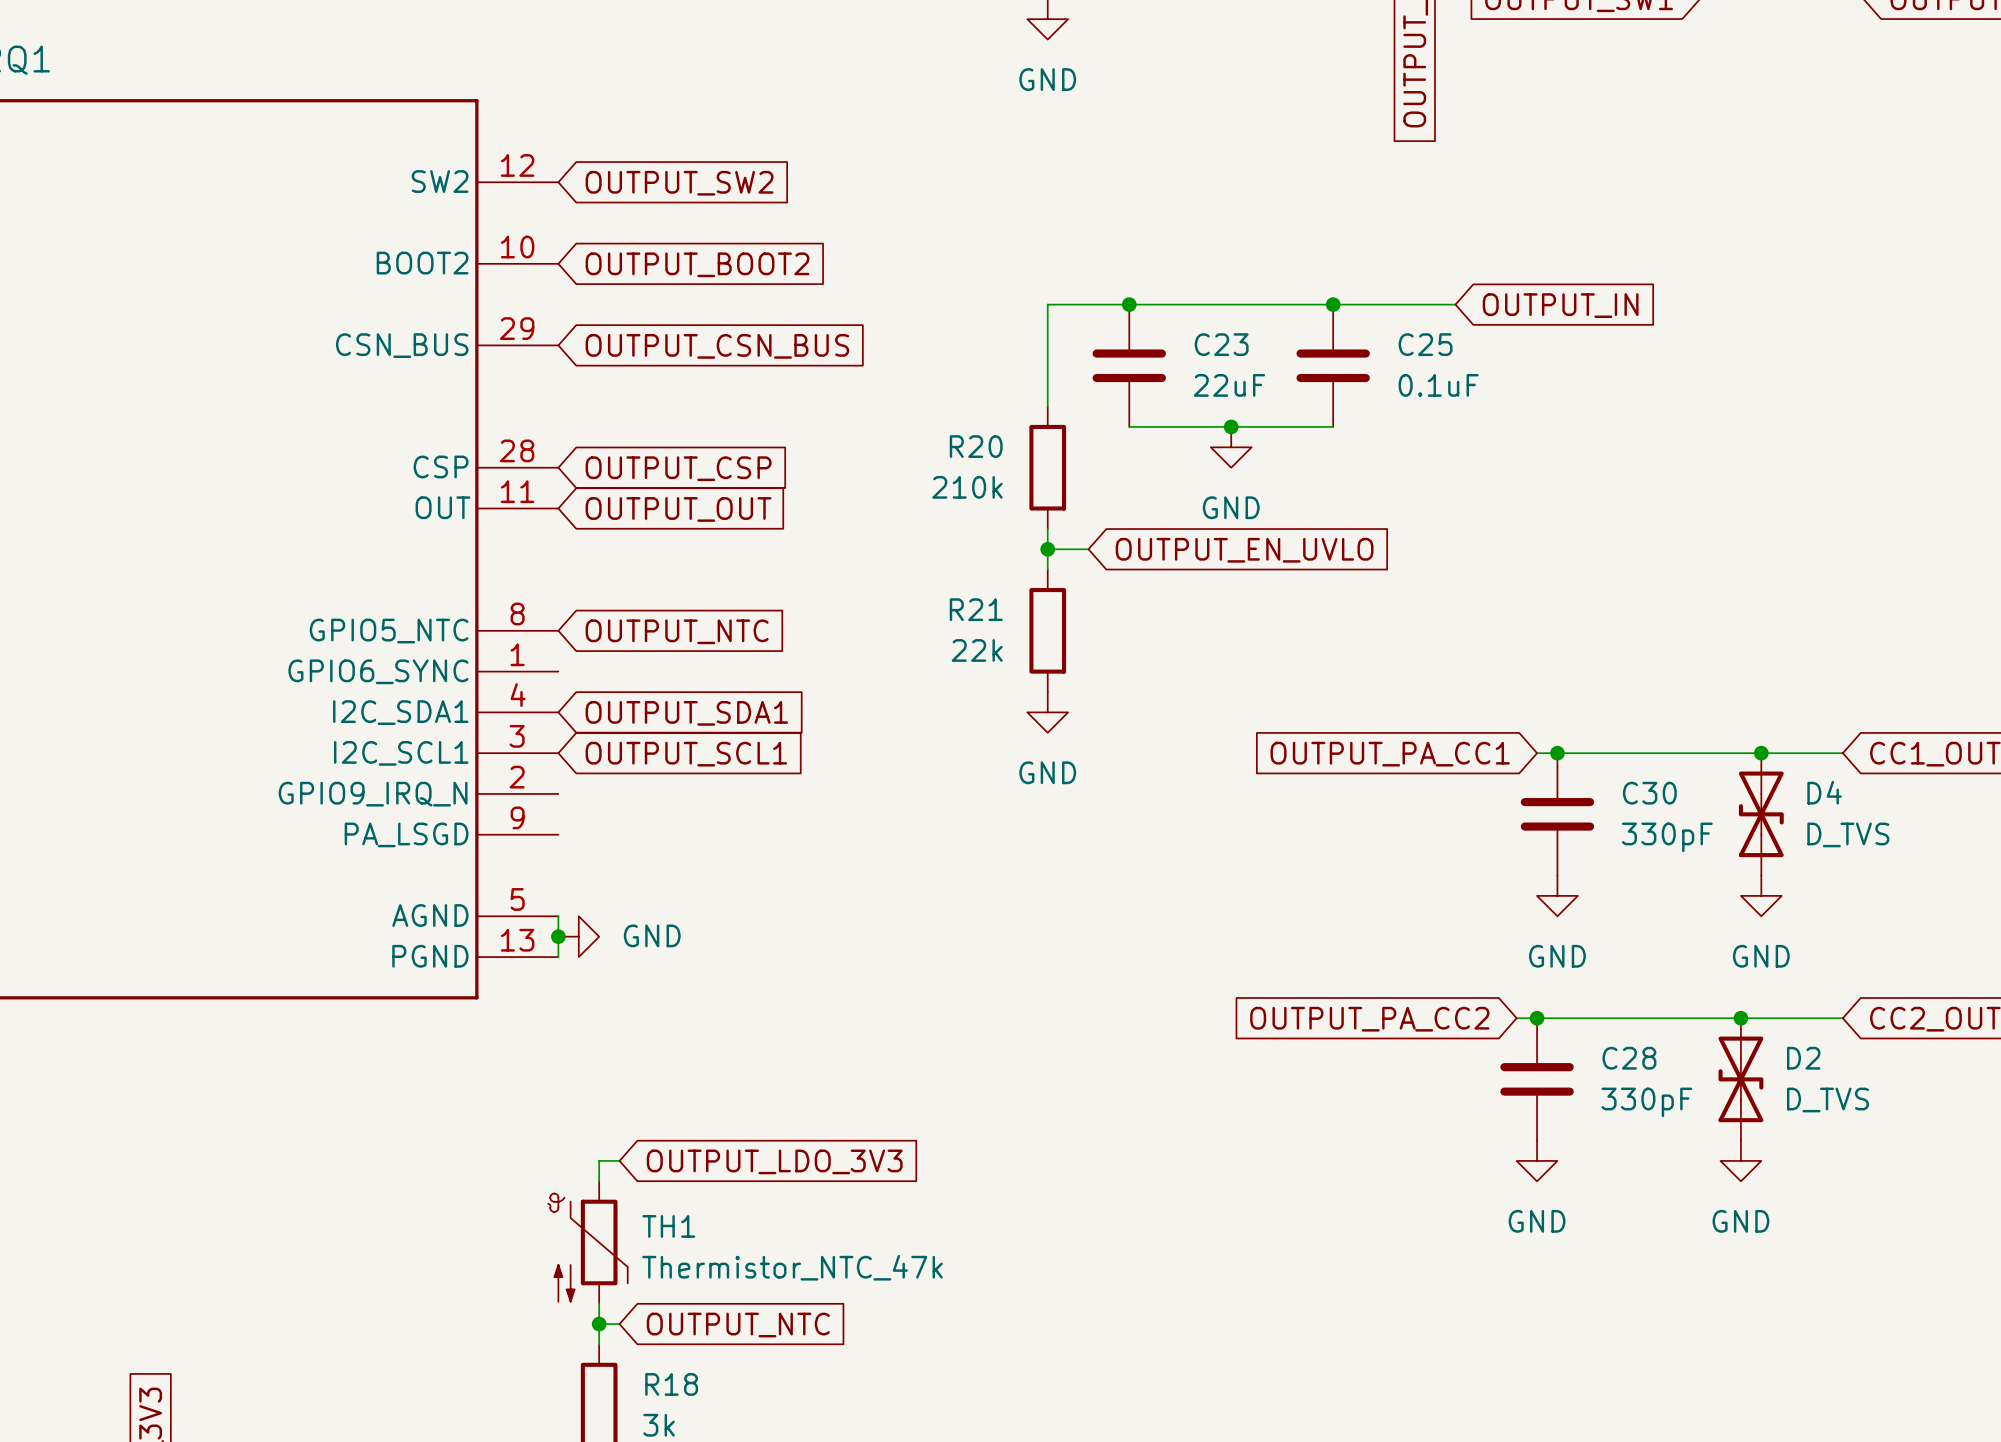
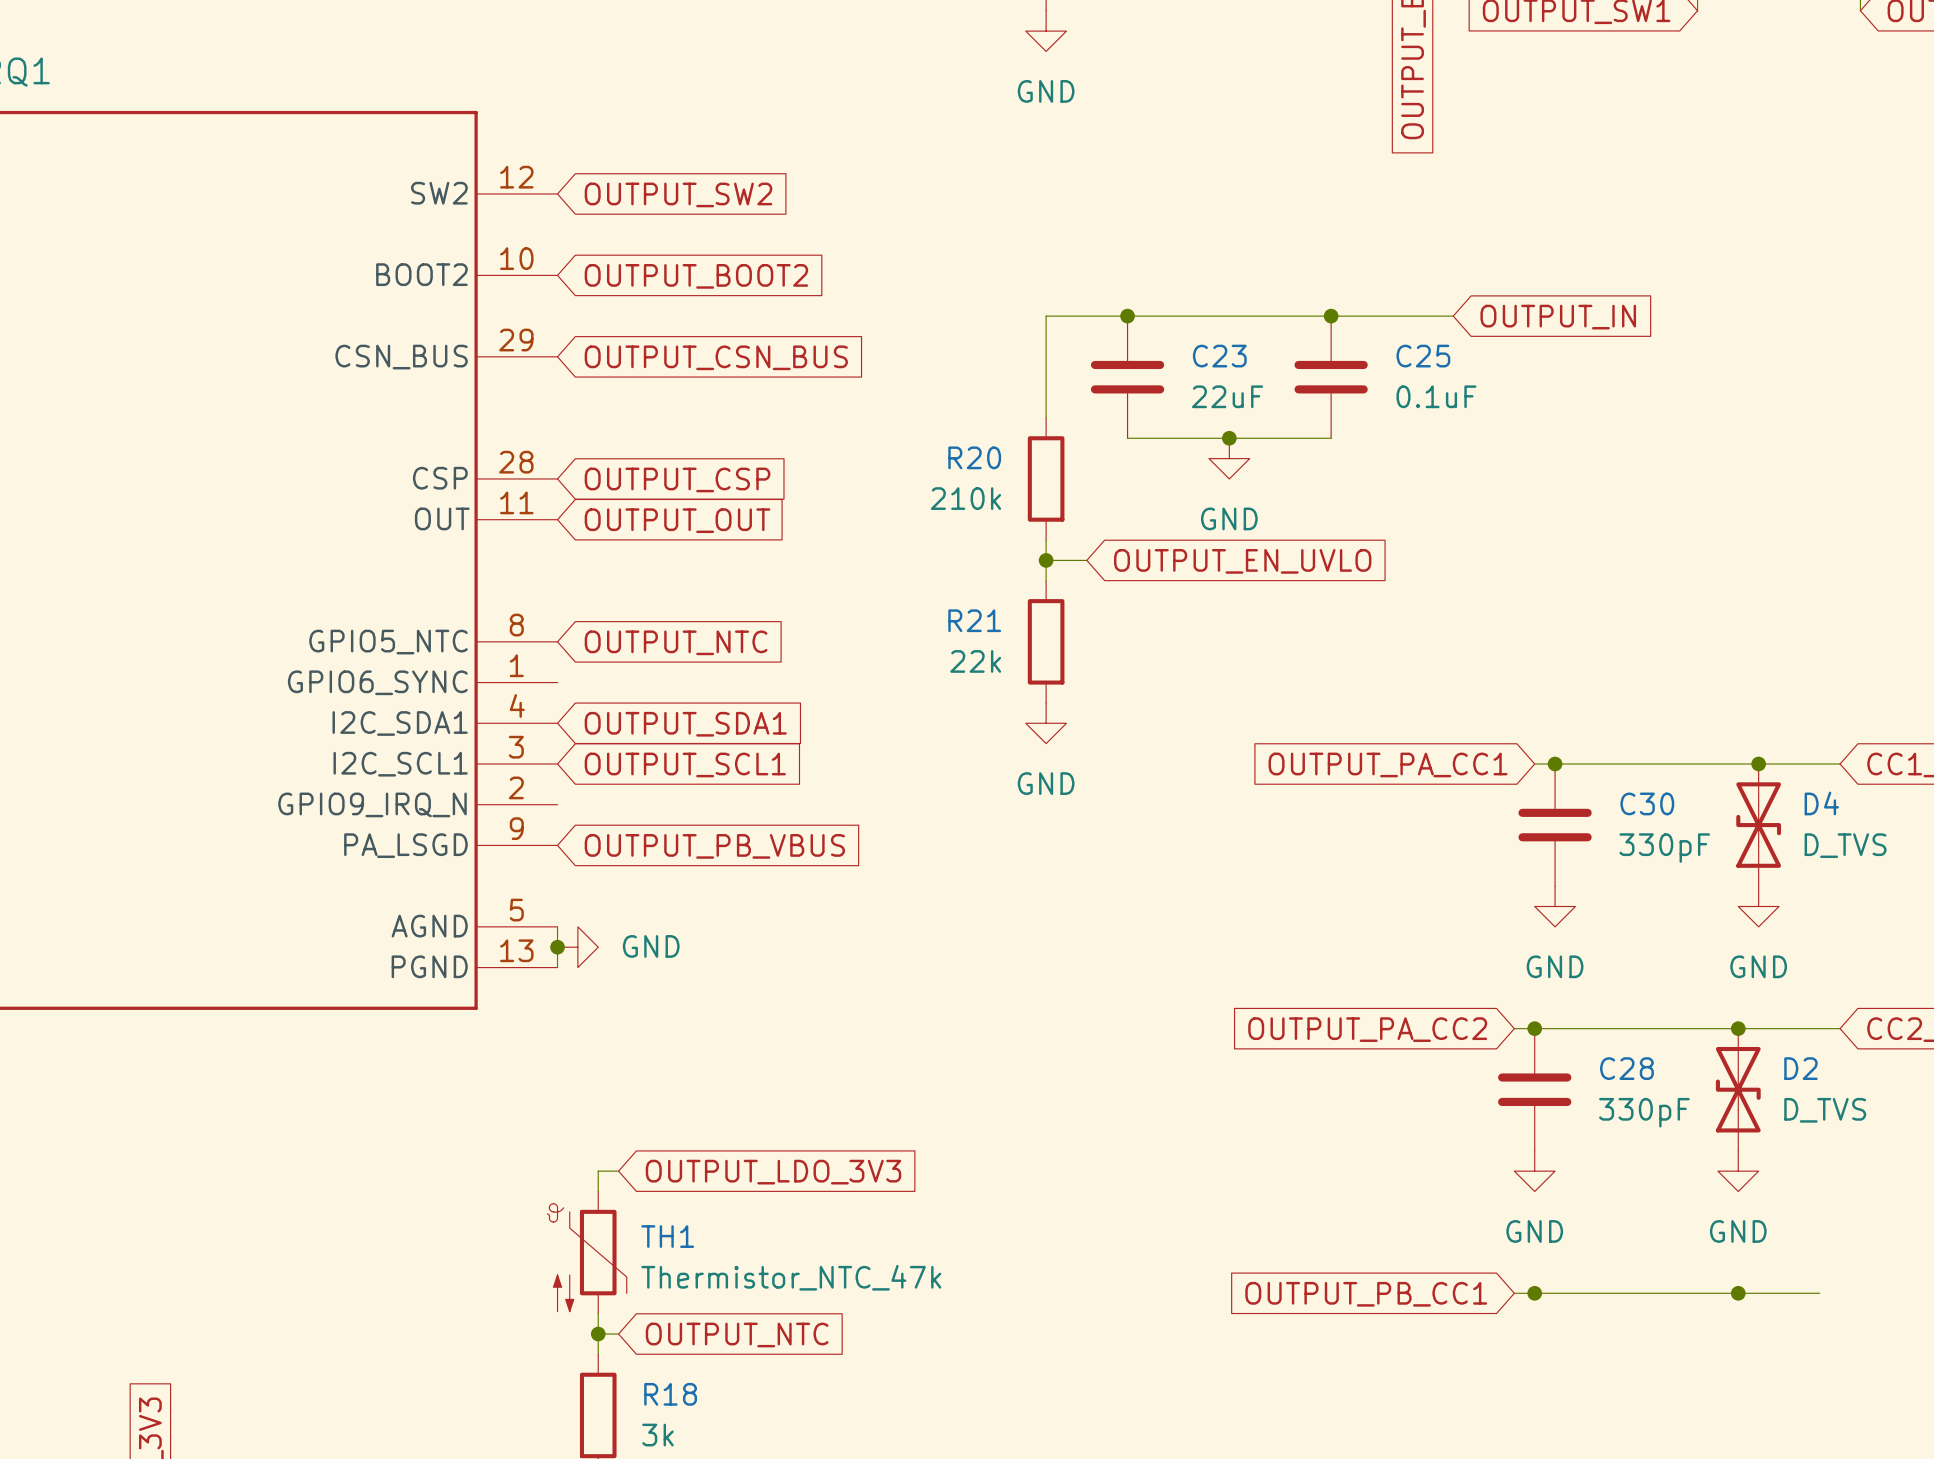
global label: none -> OUTPUT_PB_VBUS (714, 846)
wire: none -> (1514, 1293) (1819, 1293)
junction: none -> (1534, 1293)
junction: none -> (1738, 1293)
global label: none -> OUTPUT_PB_CC1 (1366, 1294)

